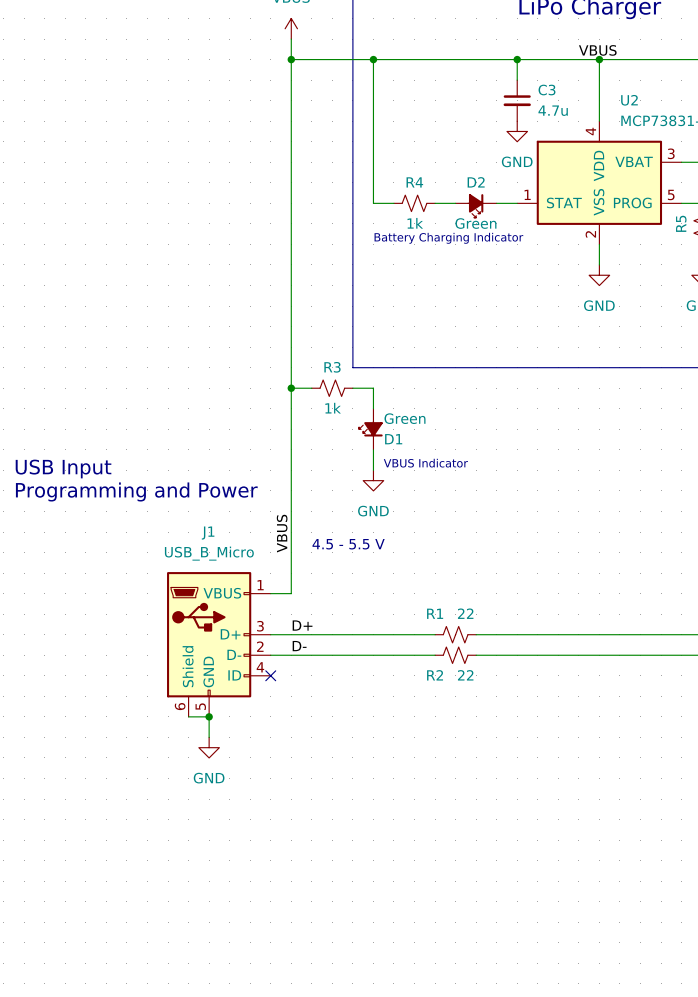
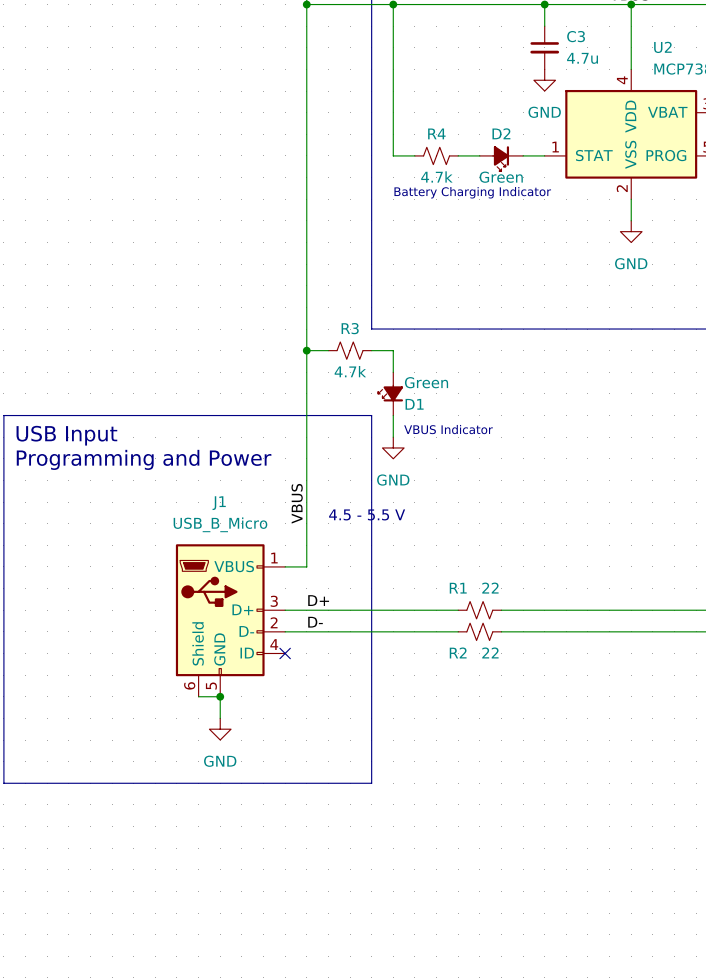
R4 value: 1k (415, 223) -> 4.7k (436, 176)
R3 value: 1k (333, 408) -> 4.7k (350, 371)
line: none -> (3, 415) (3, 783) (371, 783) (371, 415) (3, 415)

